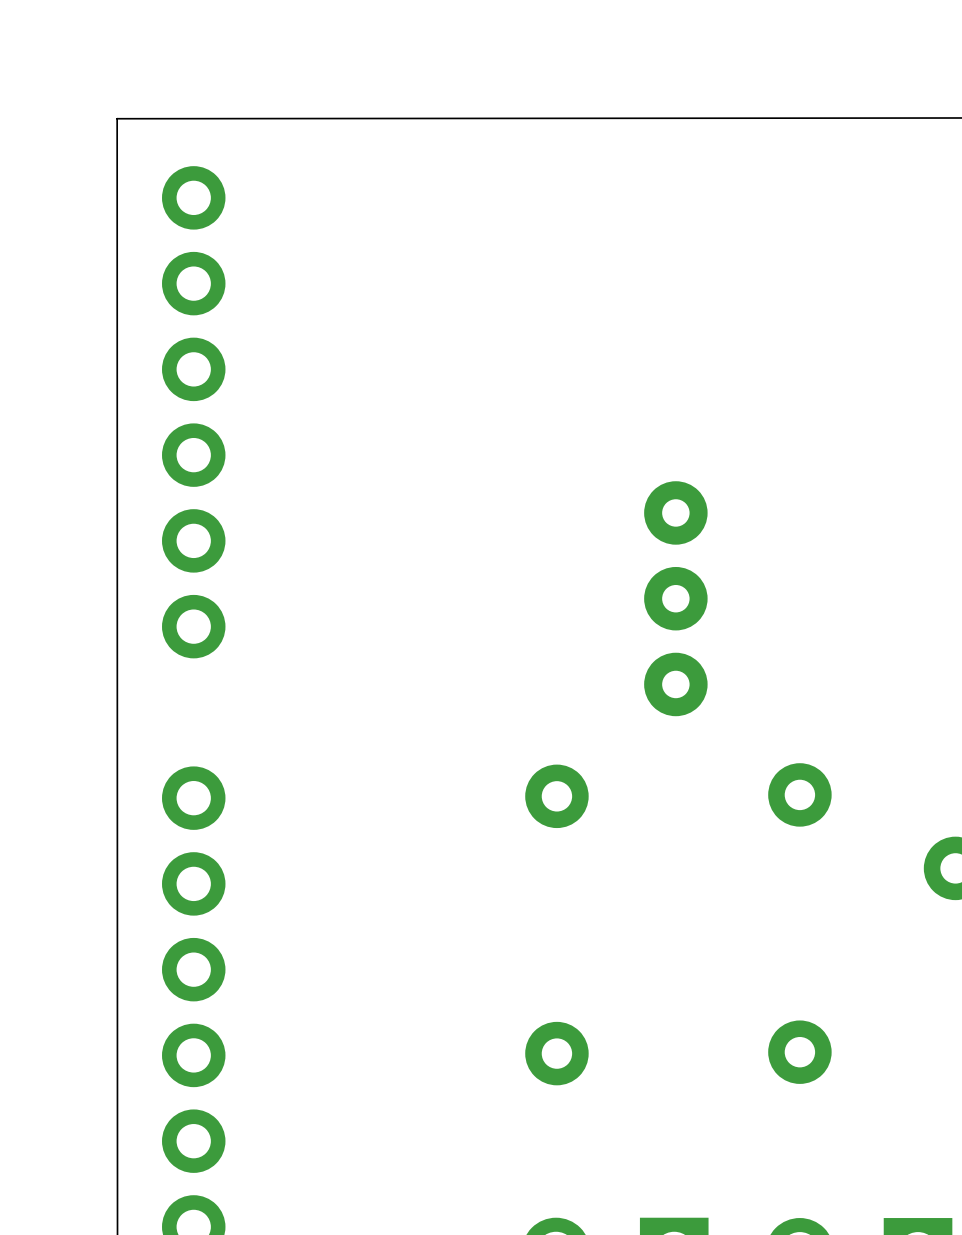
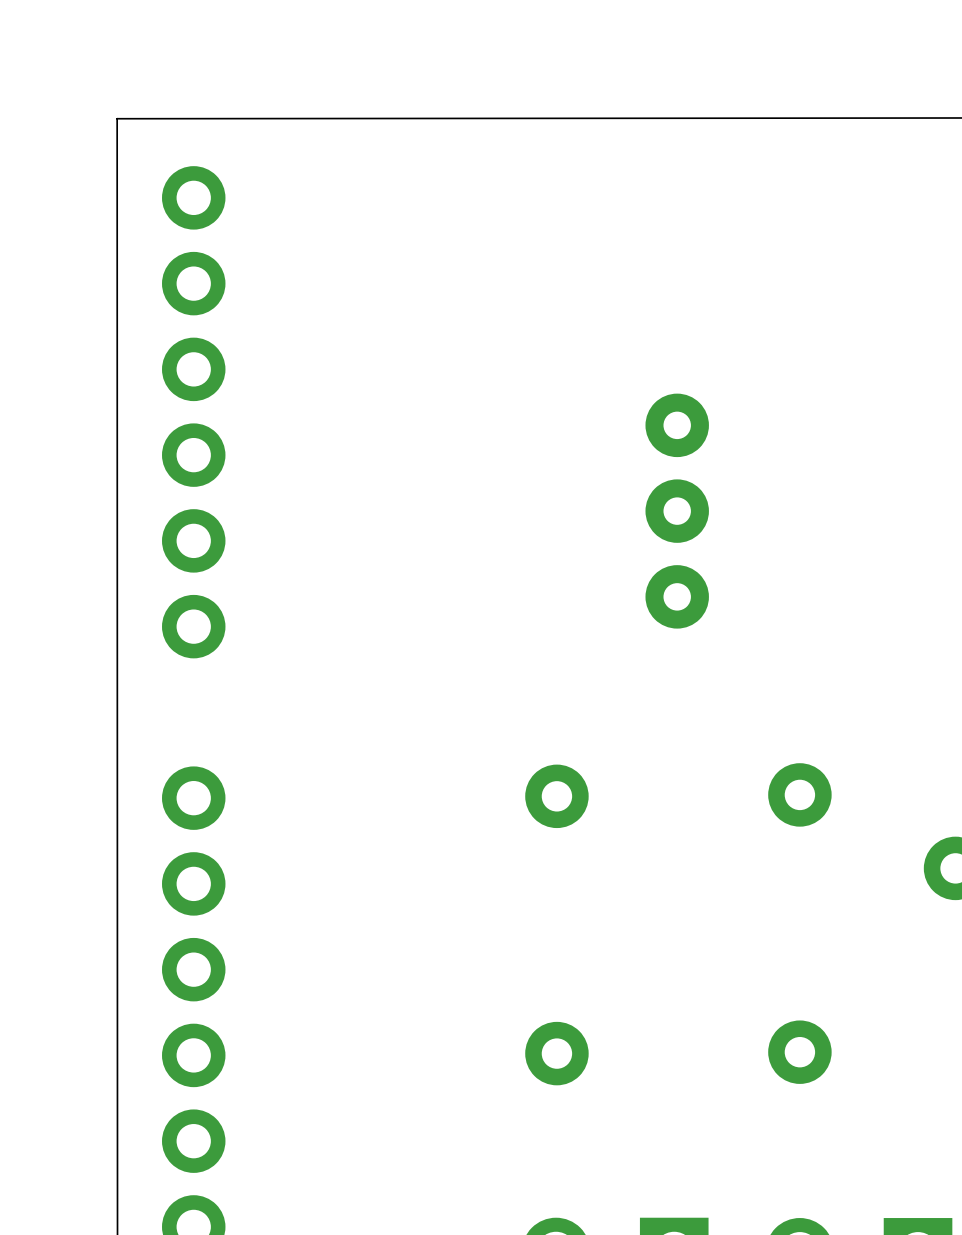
part position: (675, 598) -> (677, 511)

